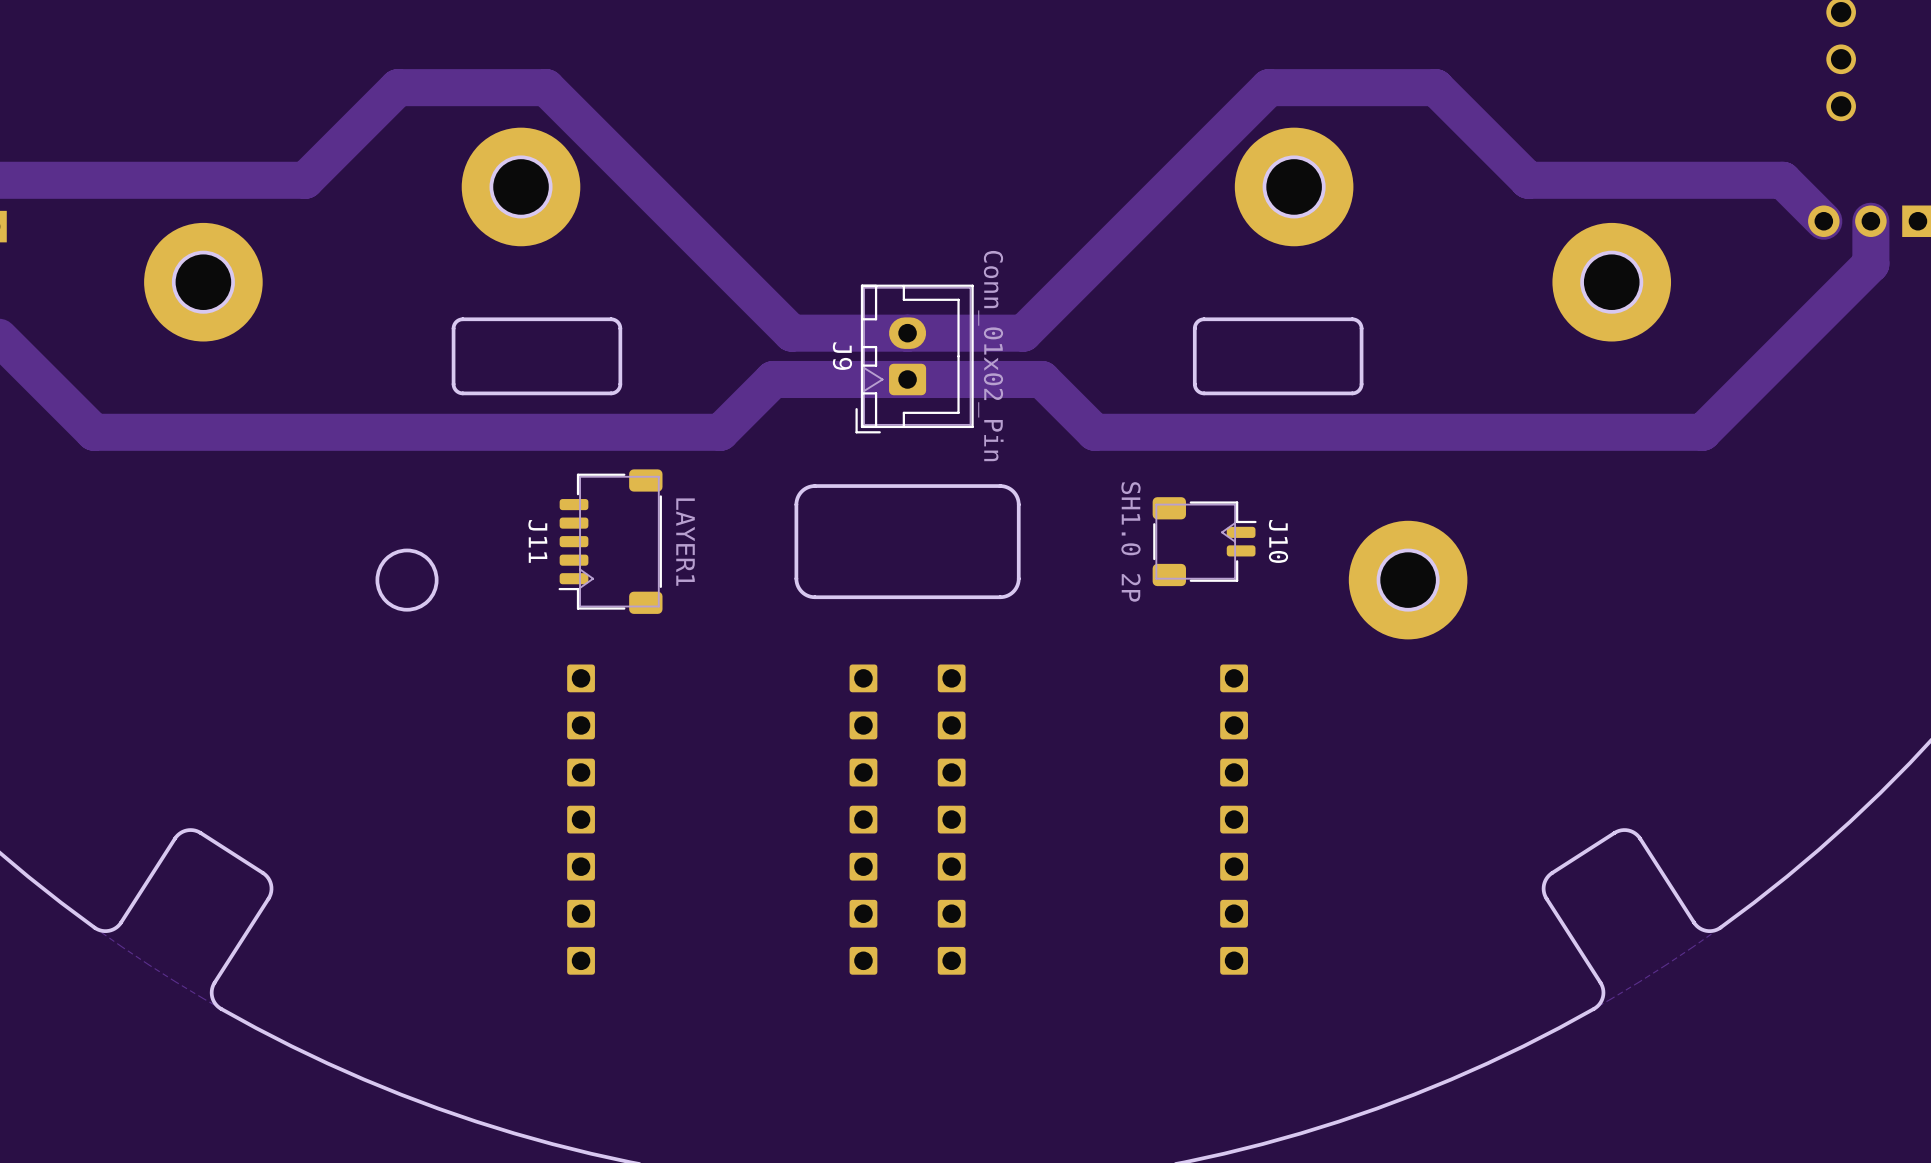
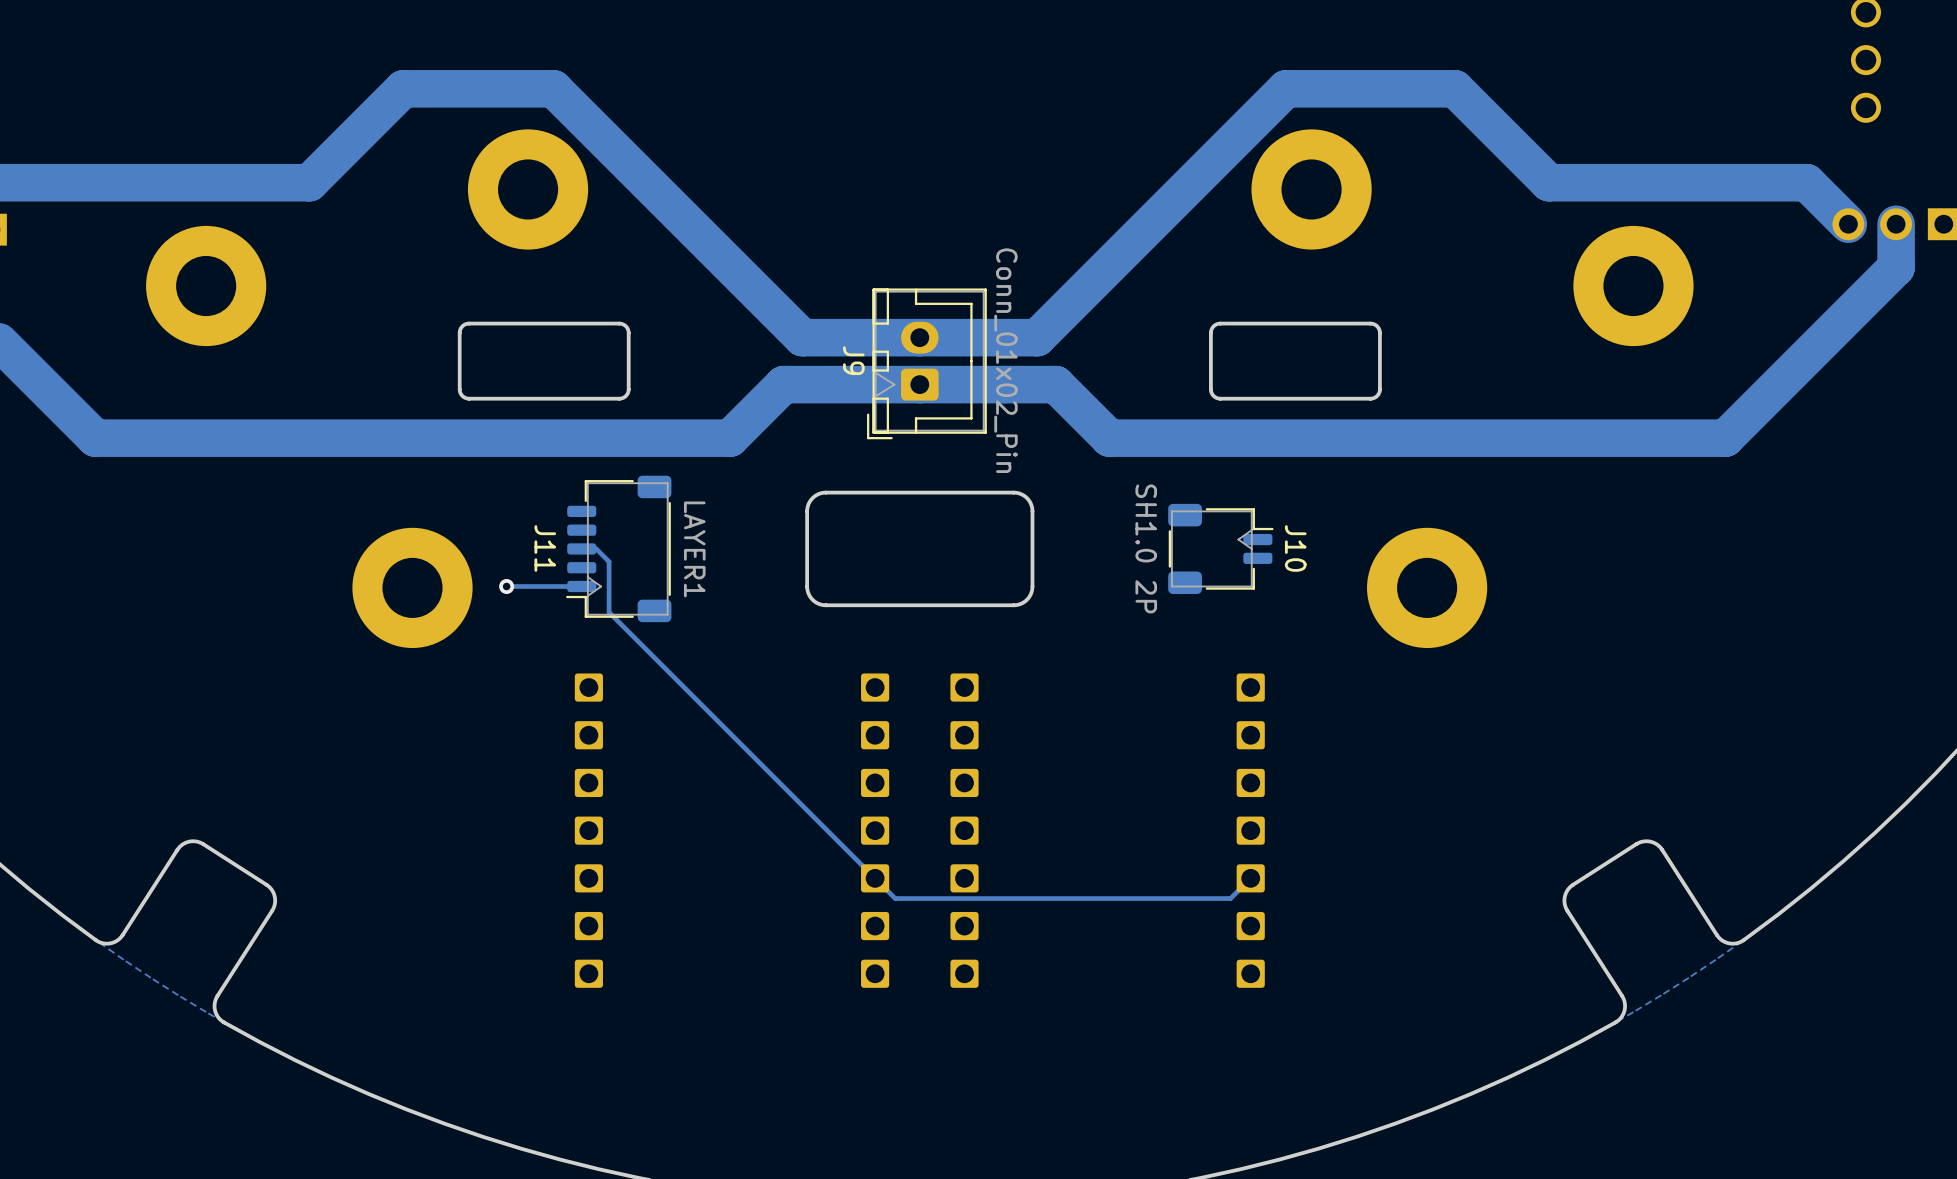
round board edge: [489, 155, 553, 219] -> none
round board edge: [1262, 155, 1326, 219] -> none
round board edge: [171, 250, 235, 314] -> none
round board edge: [1580, 250, 1644, 314] -> none
track: none -> (581, 548) (596, 548) (609, 561) (609, 612) (895, 898) (1230, 898) (1250, 878)
round board edge: [375, 548, 439, 612] -> none
round board edge: [1376, 548, 1440, 612] -> none
via: none -> (506, 586)
track: none -> (581, 586) (506, 586)
part: none -> (412, 587)

